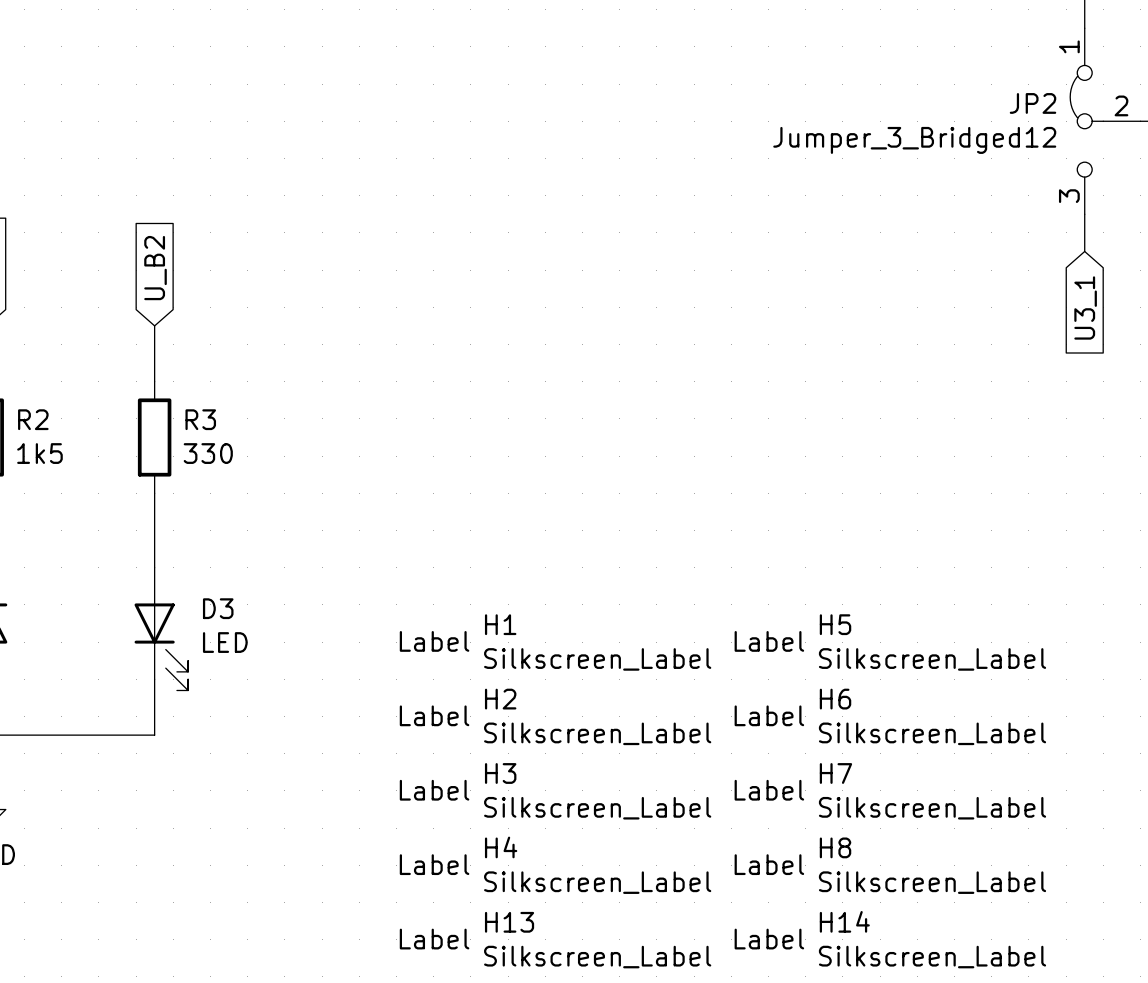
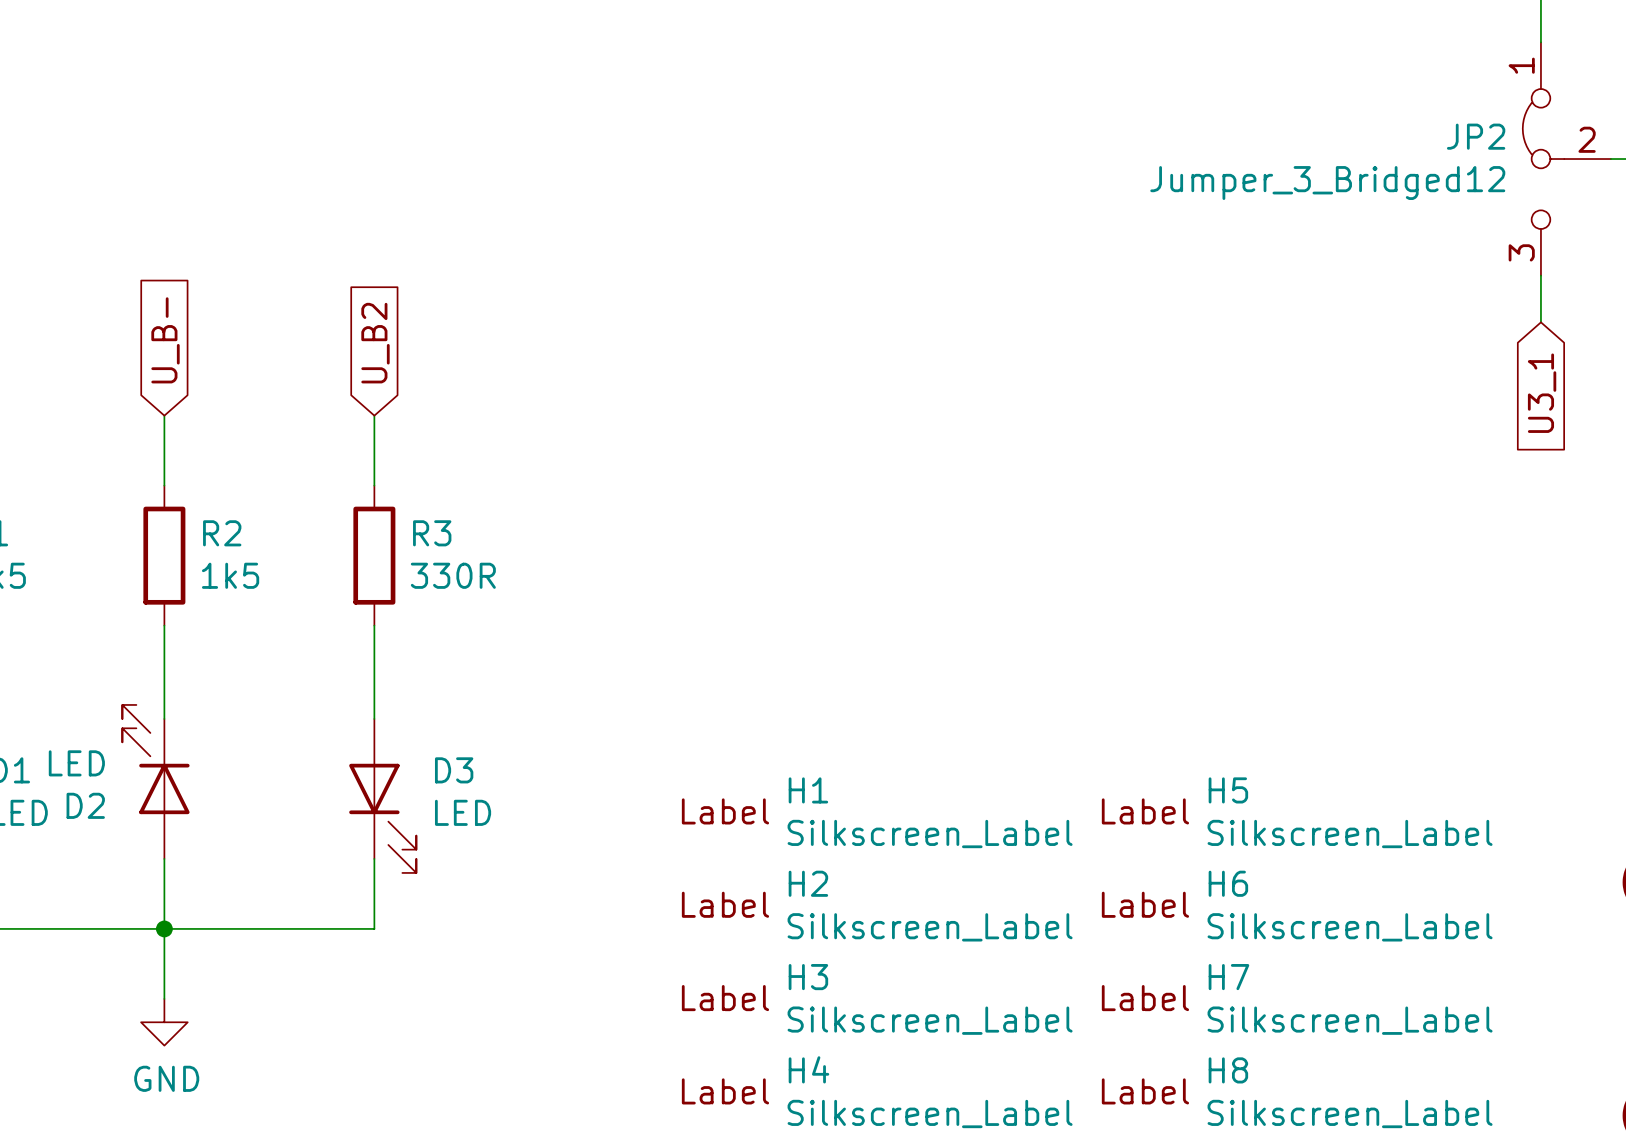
R3 value: 330 (208, 453) -> 330R (453, 575)

